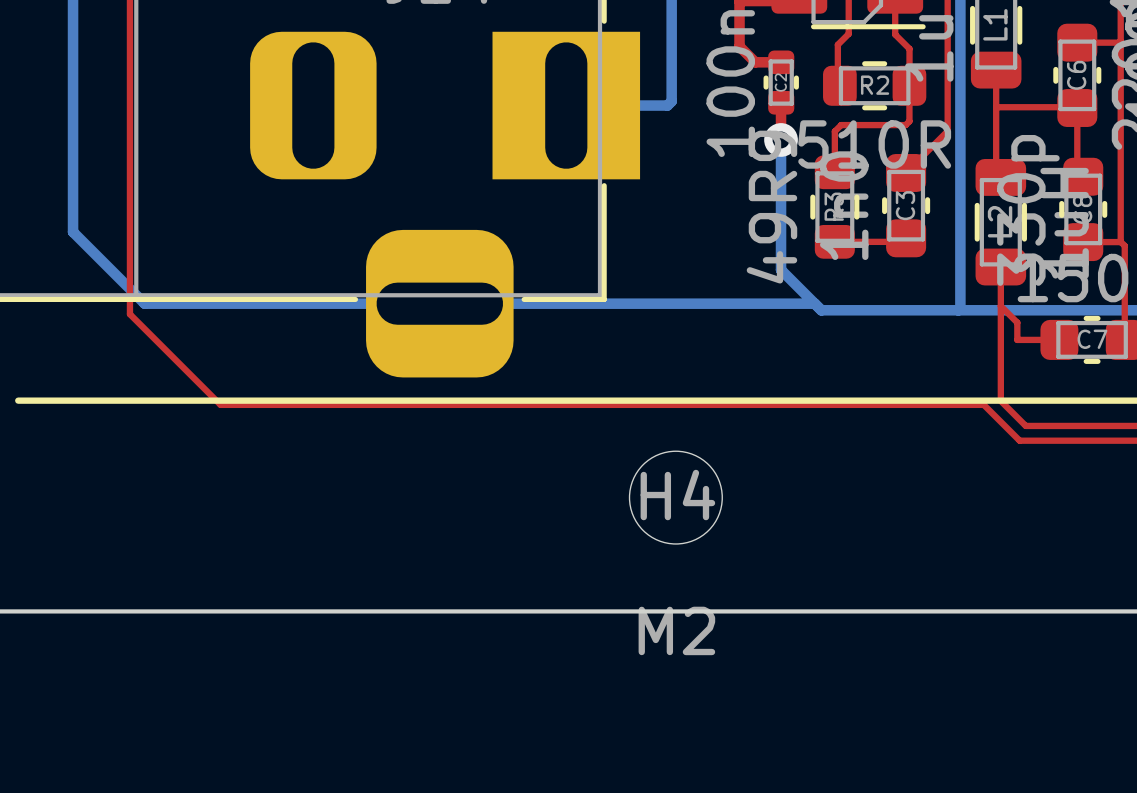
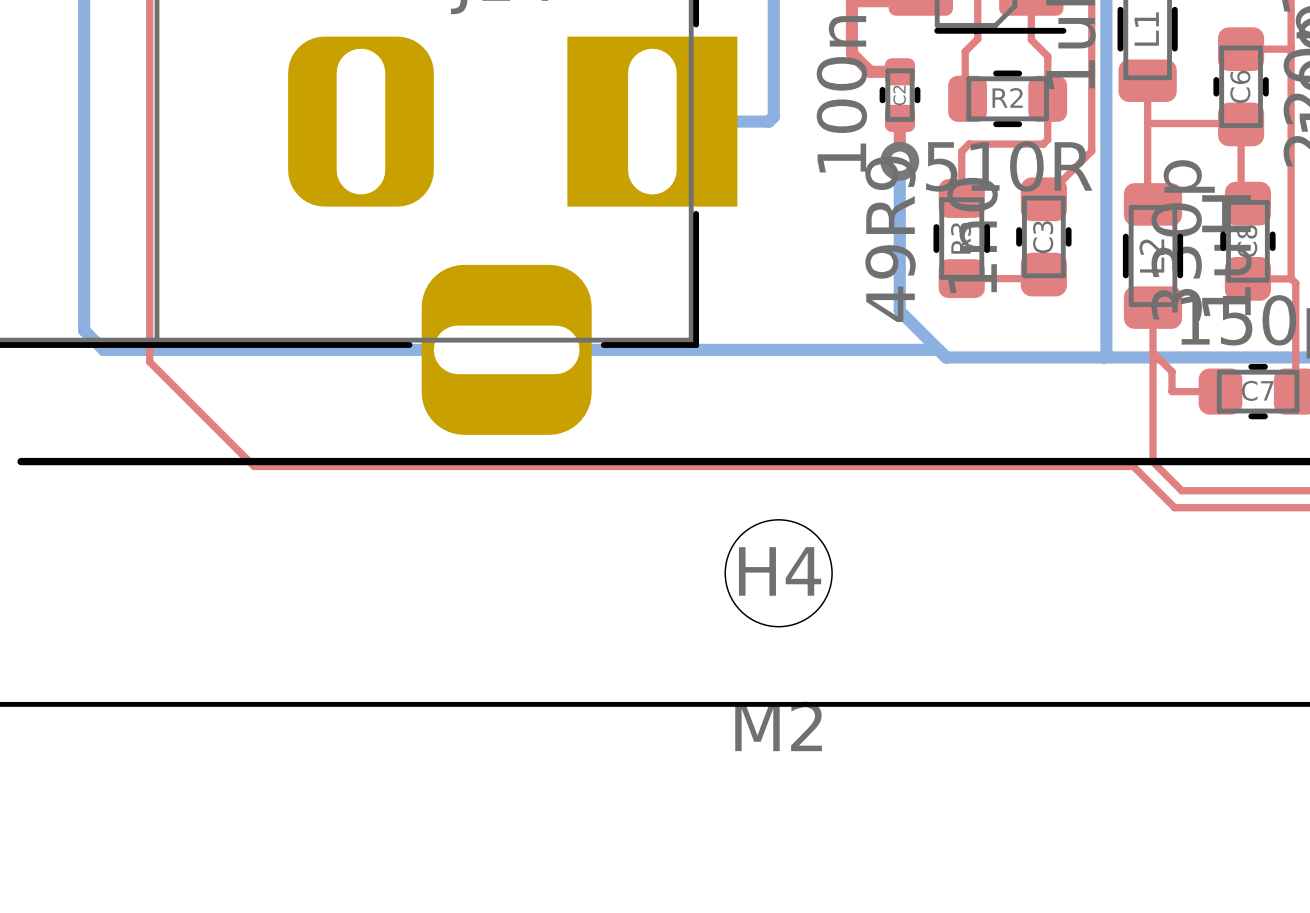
bottom track: (73, 232) (144, 303) -> (84, 267) (84, 330) (103, 349) (166, 349)

